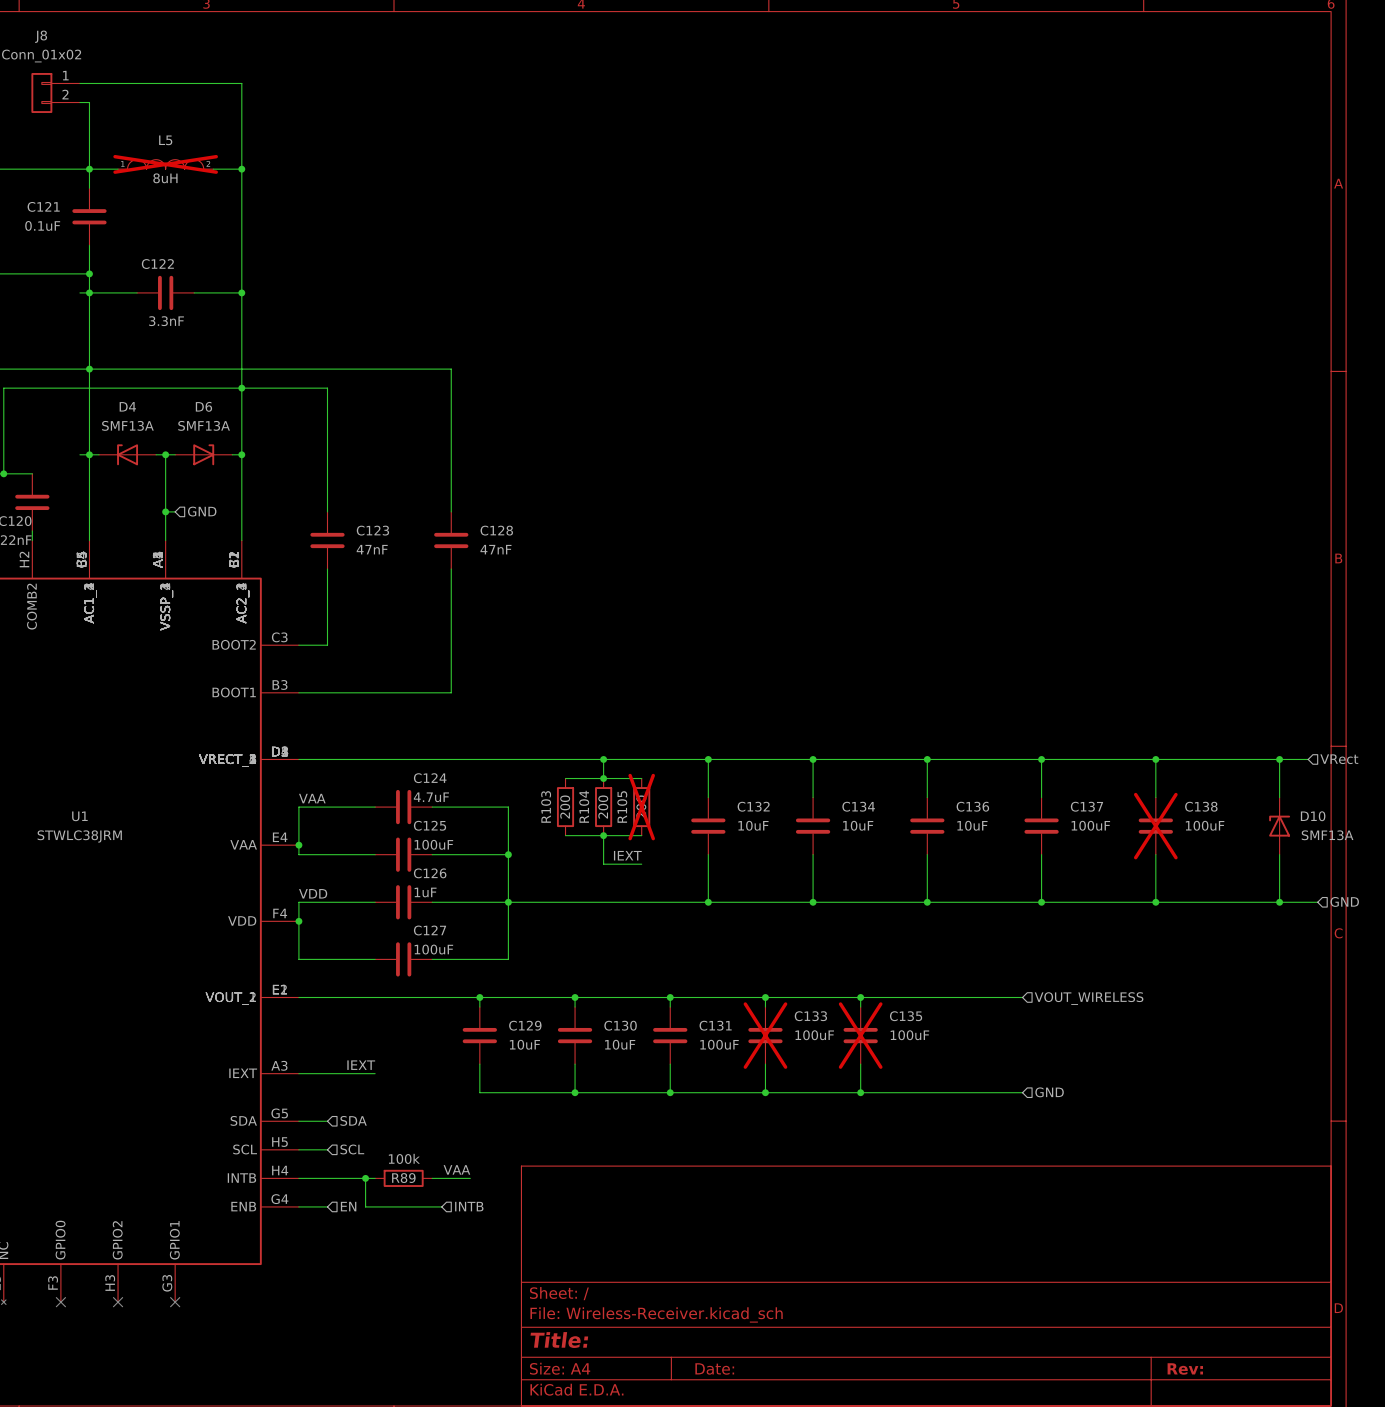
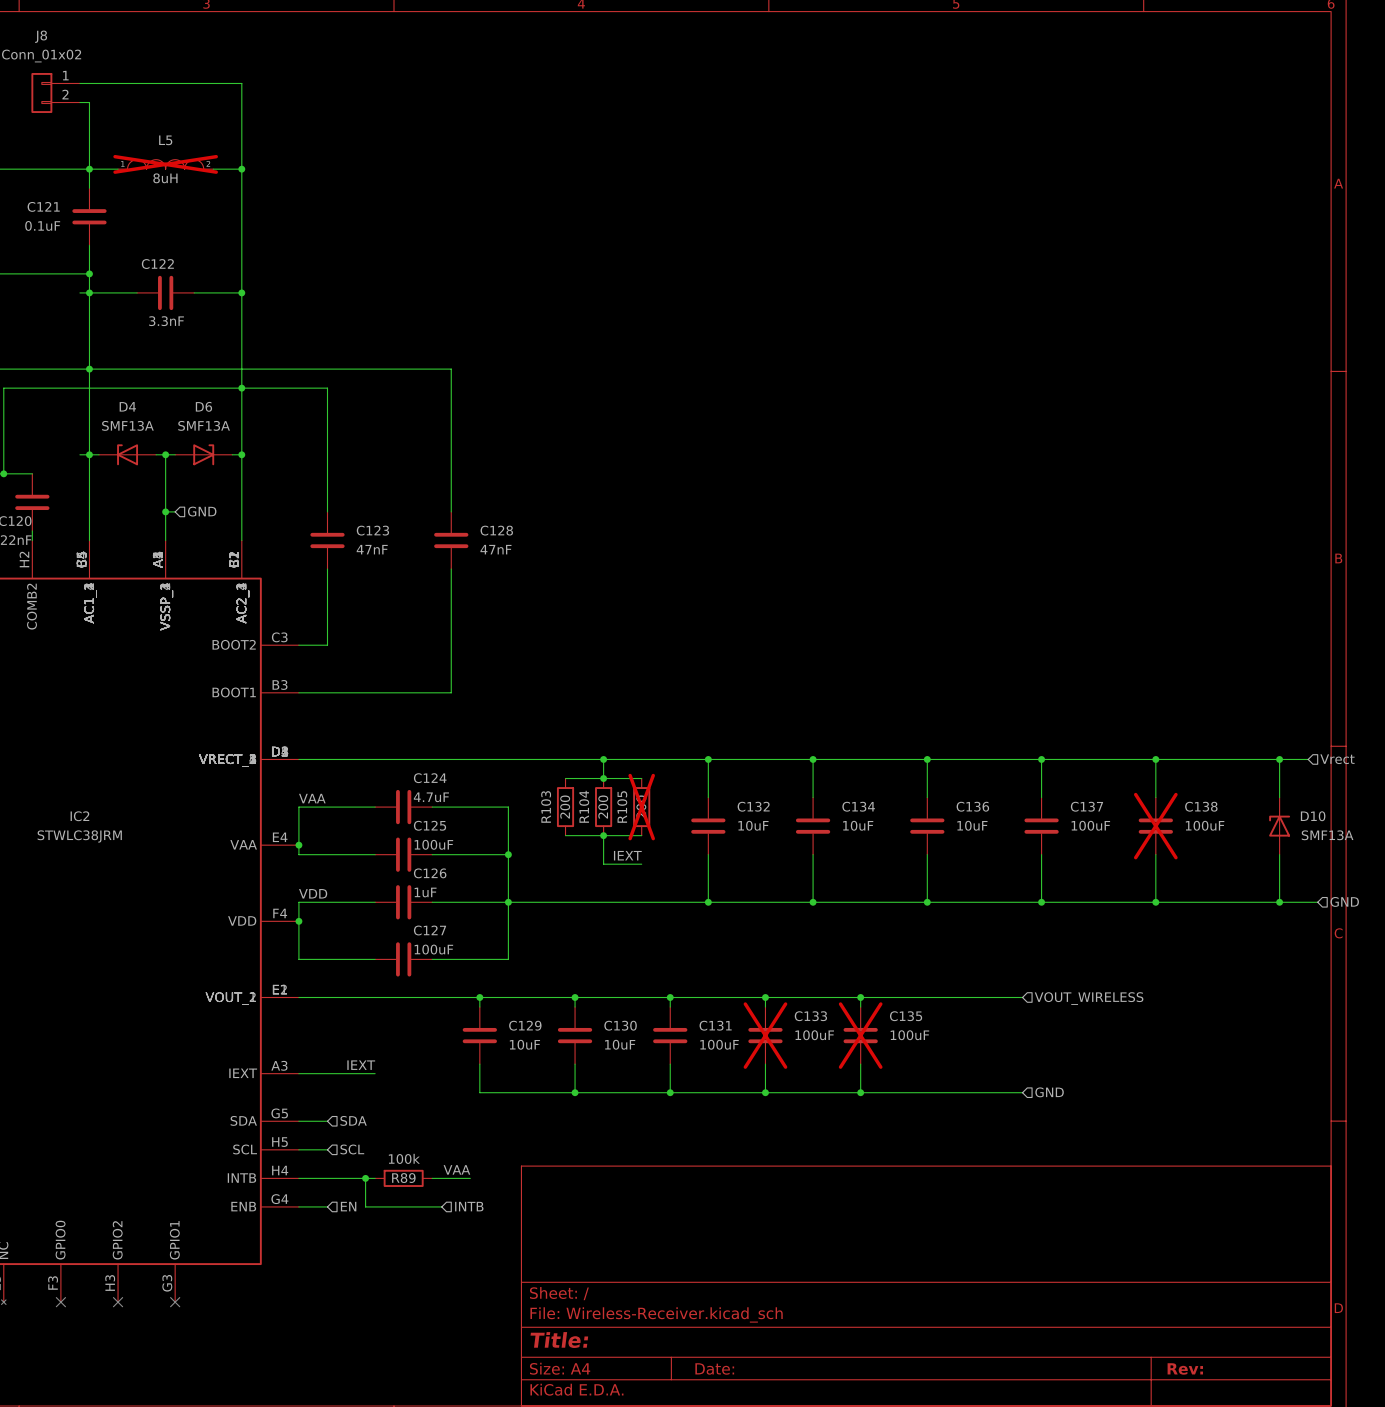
hierarchical label: VRect (1339, 759) -> Vrect (1337, 759)
U1 name: U1 (79, 816) -> IC2 (79, 816)

